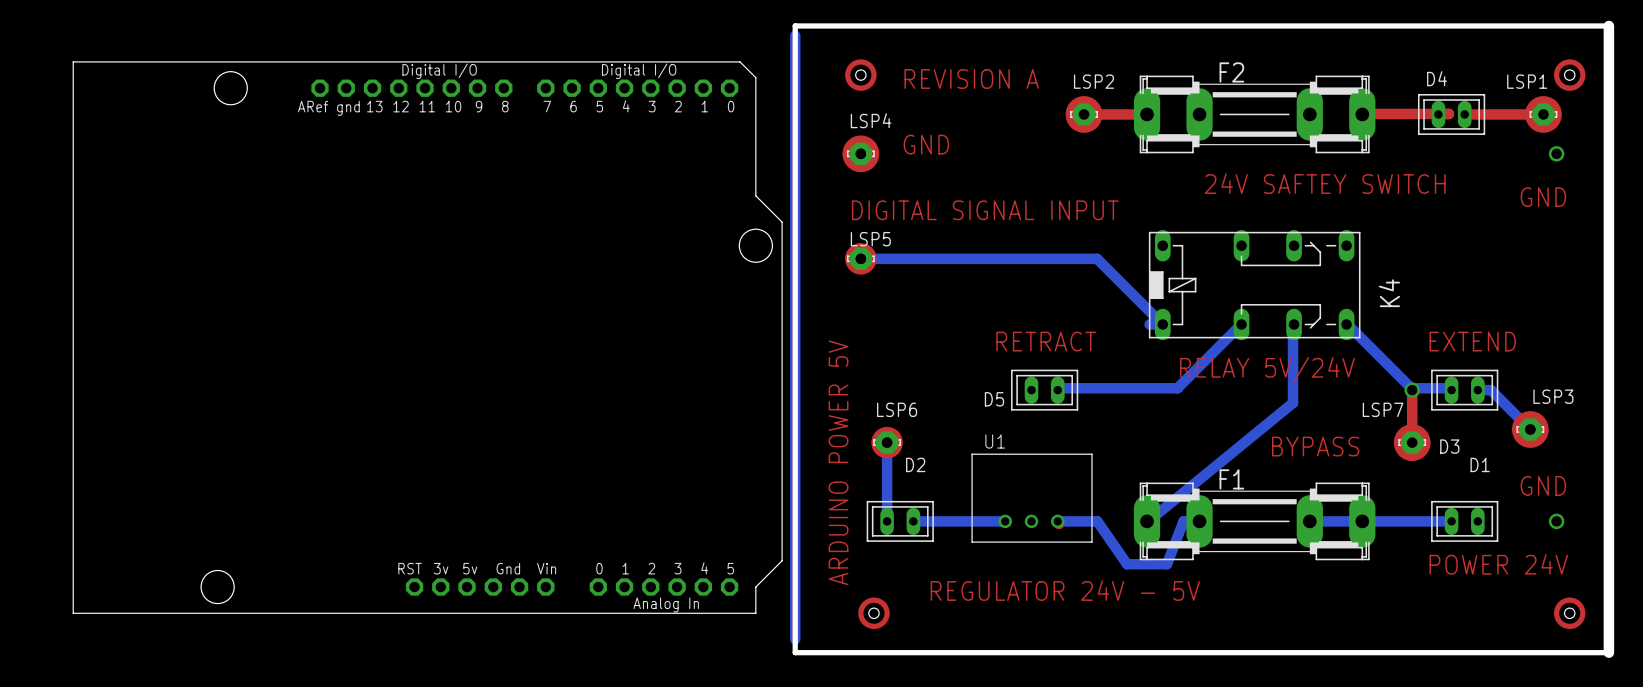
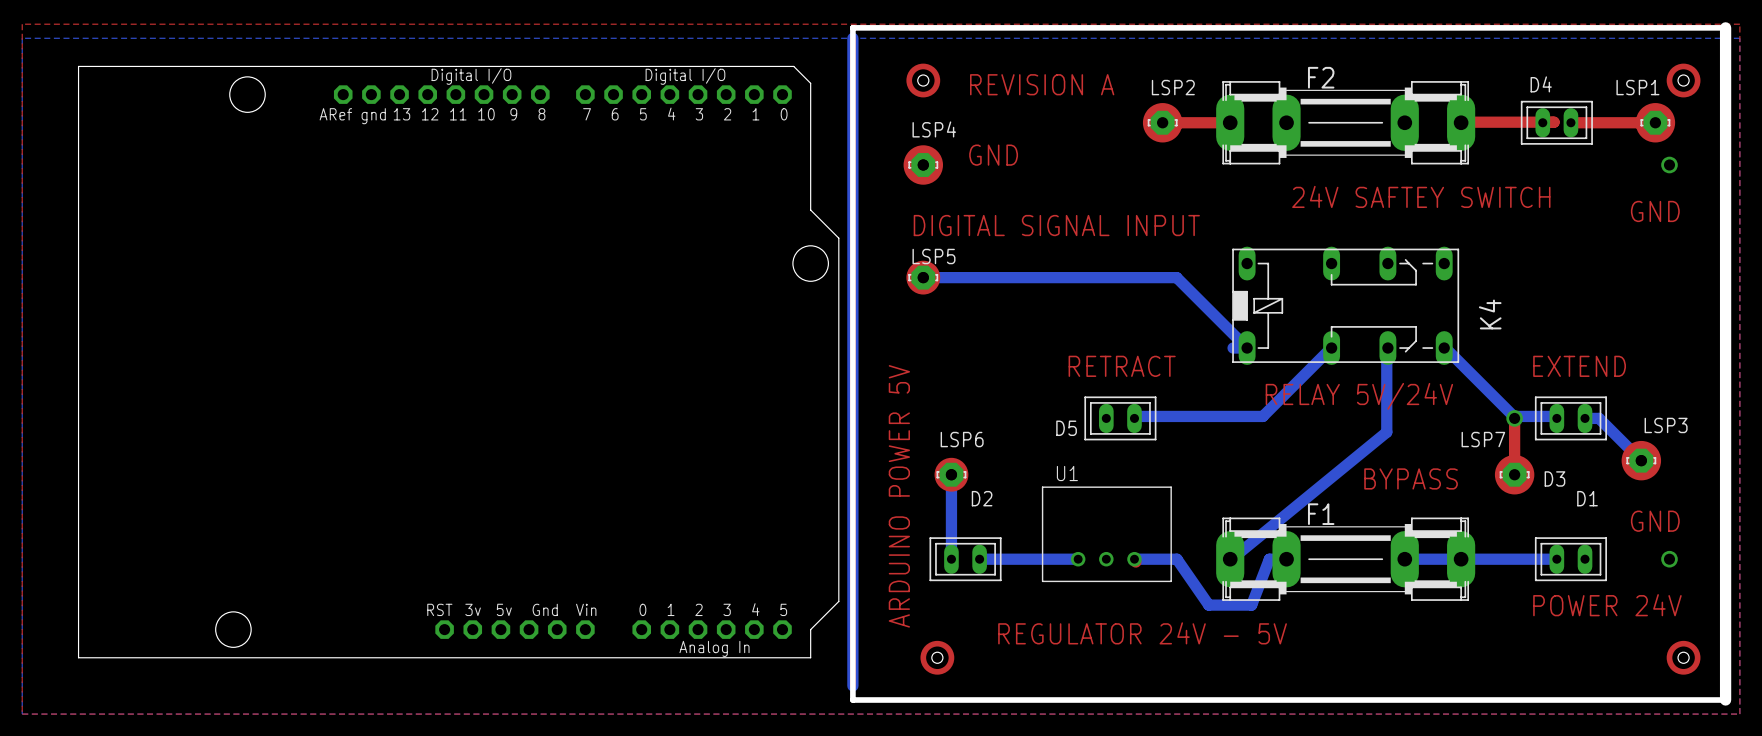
top zone outline: none -> (22, 24) (1739, 24) (1739, 714) (22, 714) (22, 24)
bottom zone outline: none -> (22, 38) (22, 714) (1739, 714) (1739, 38) (22, 38)

